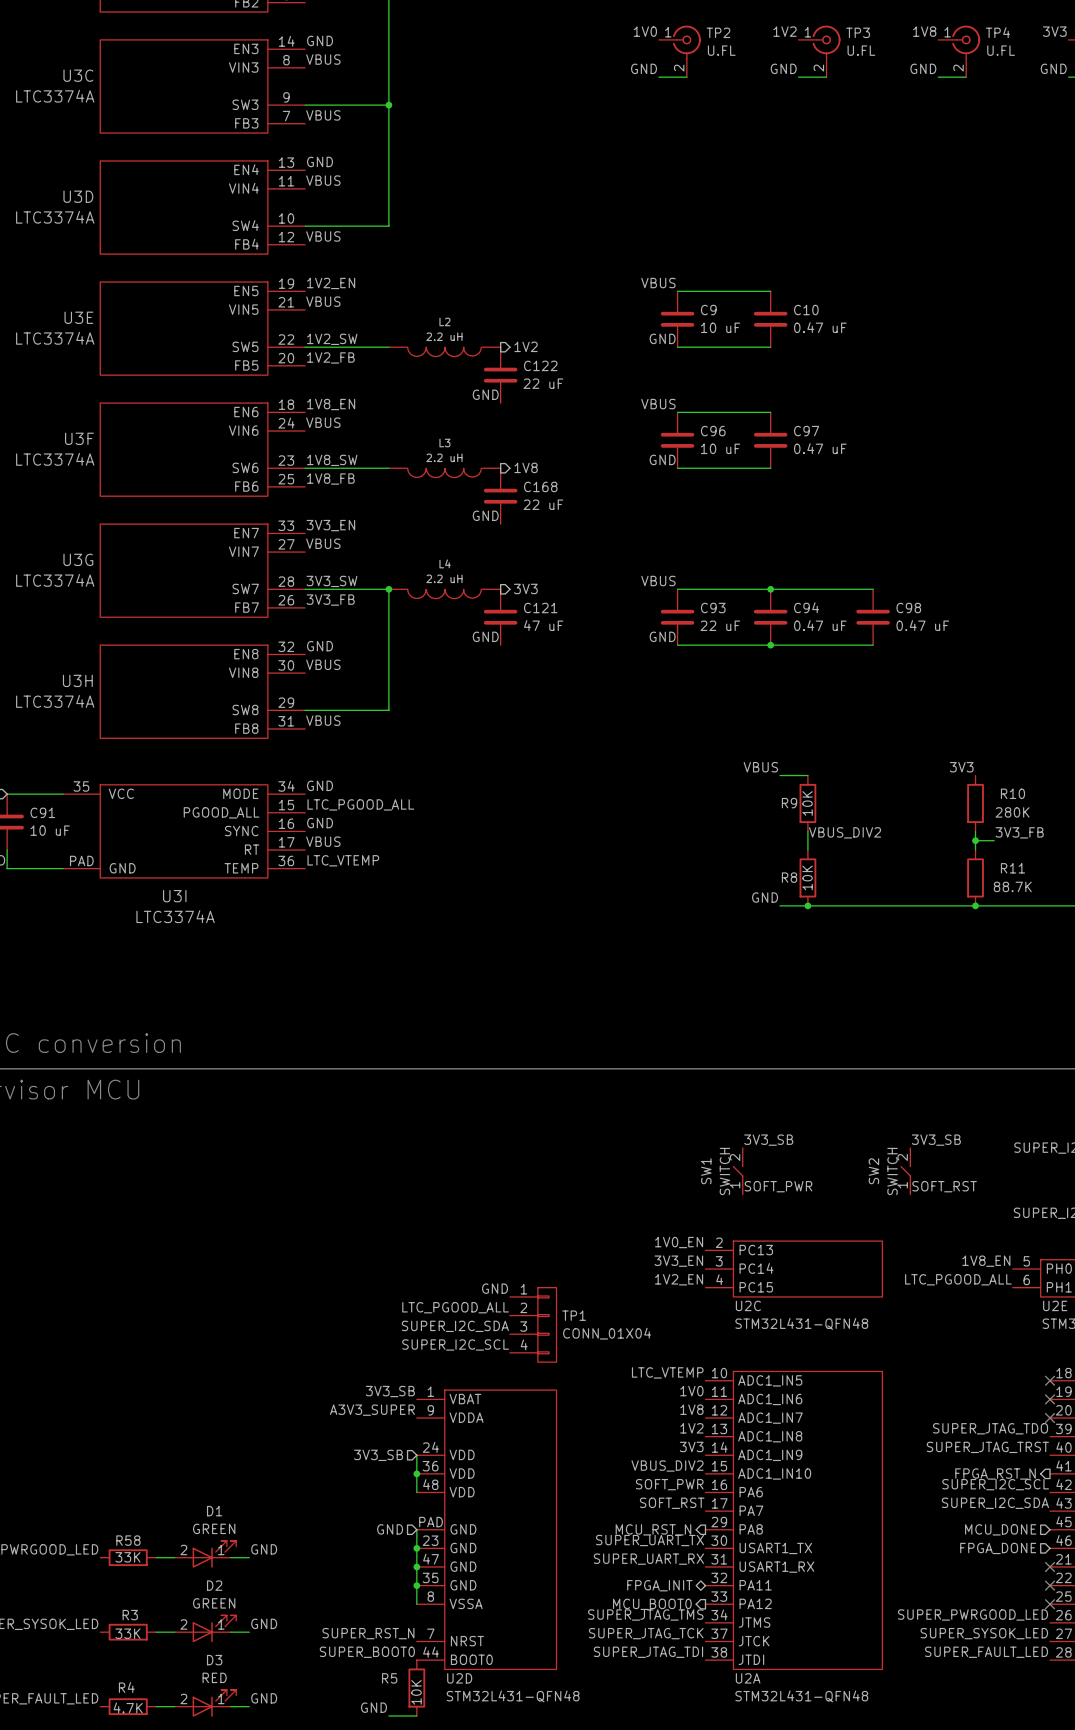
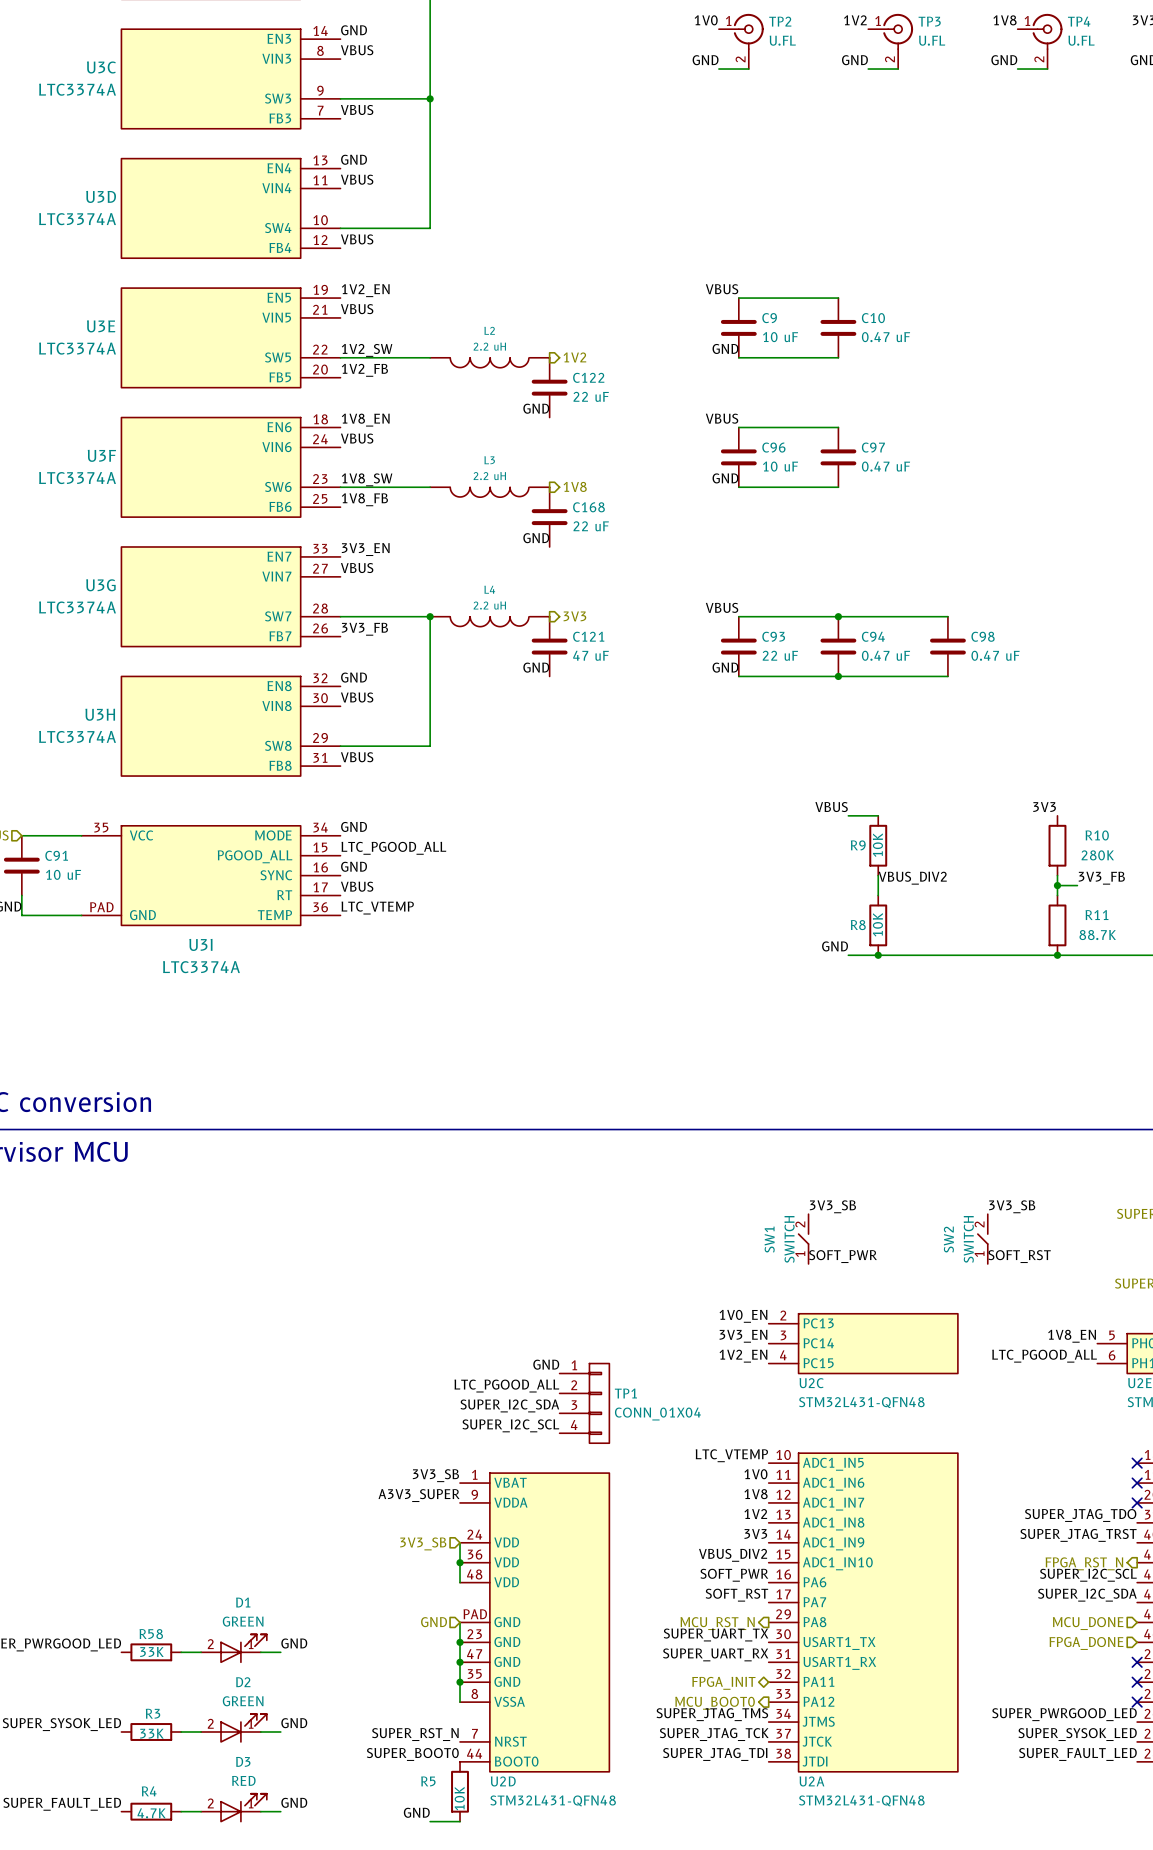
label: 3V3_SW (332, 581) -> none

